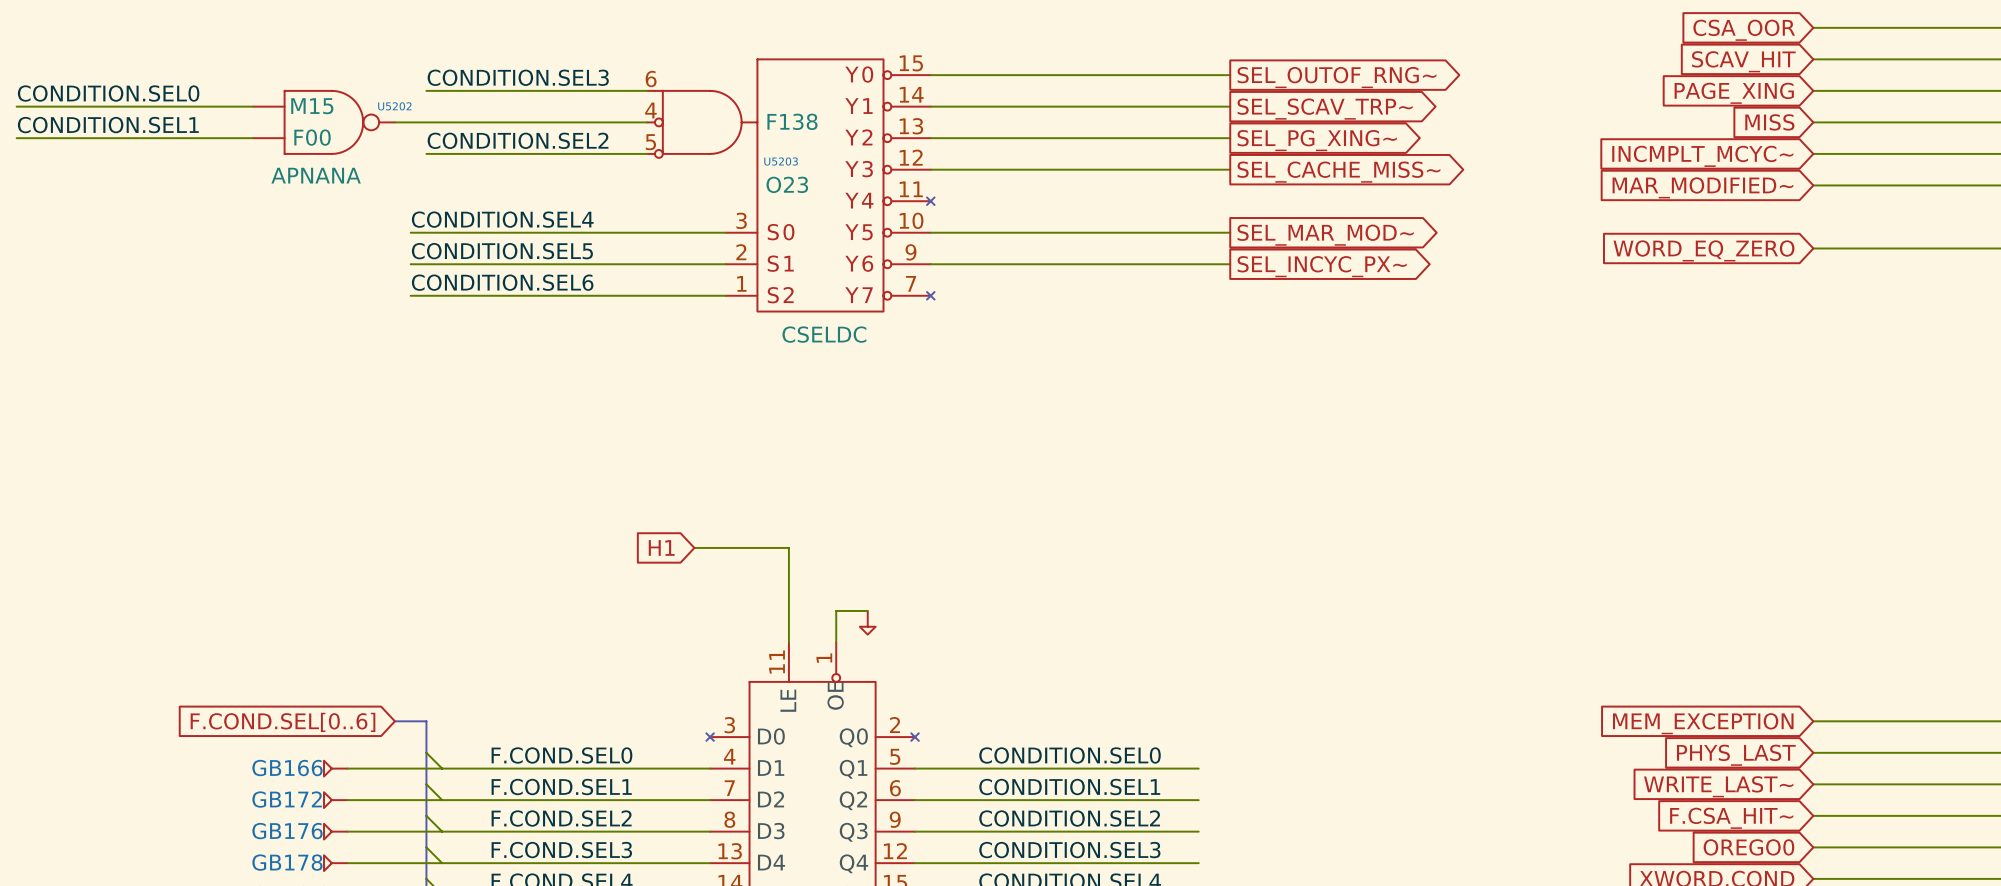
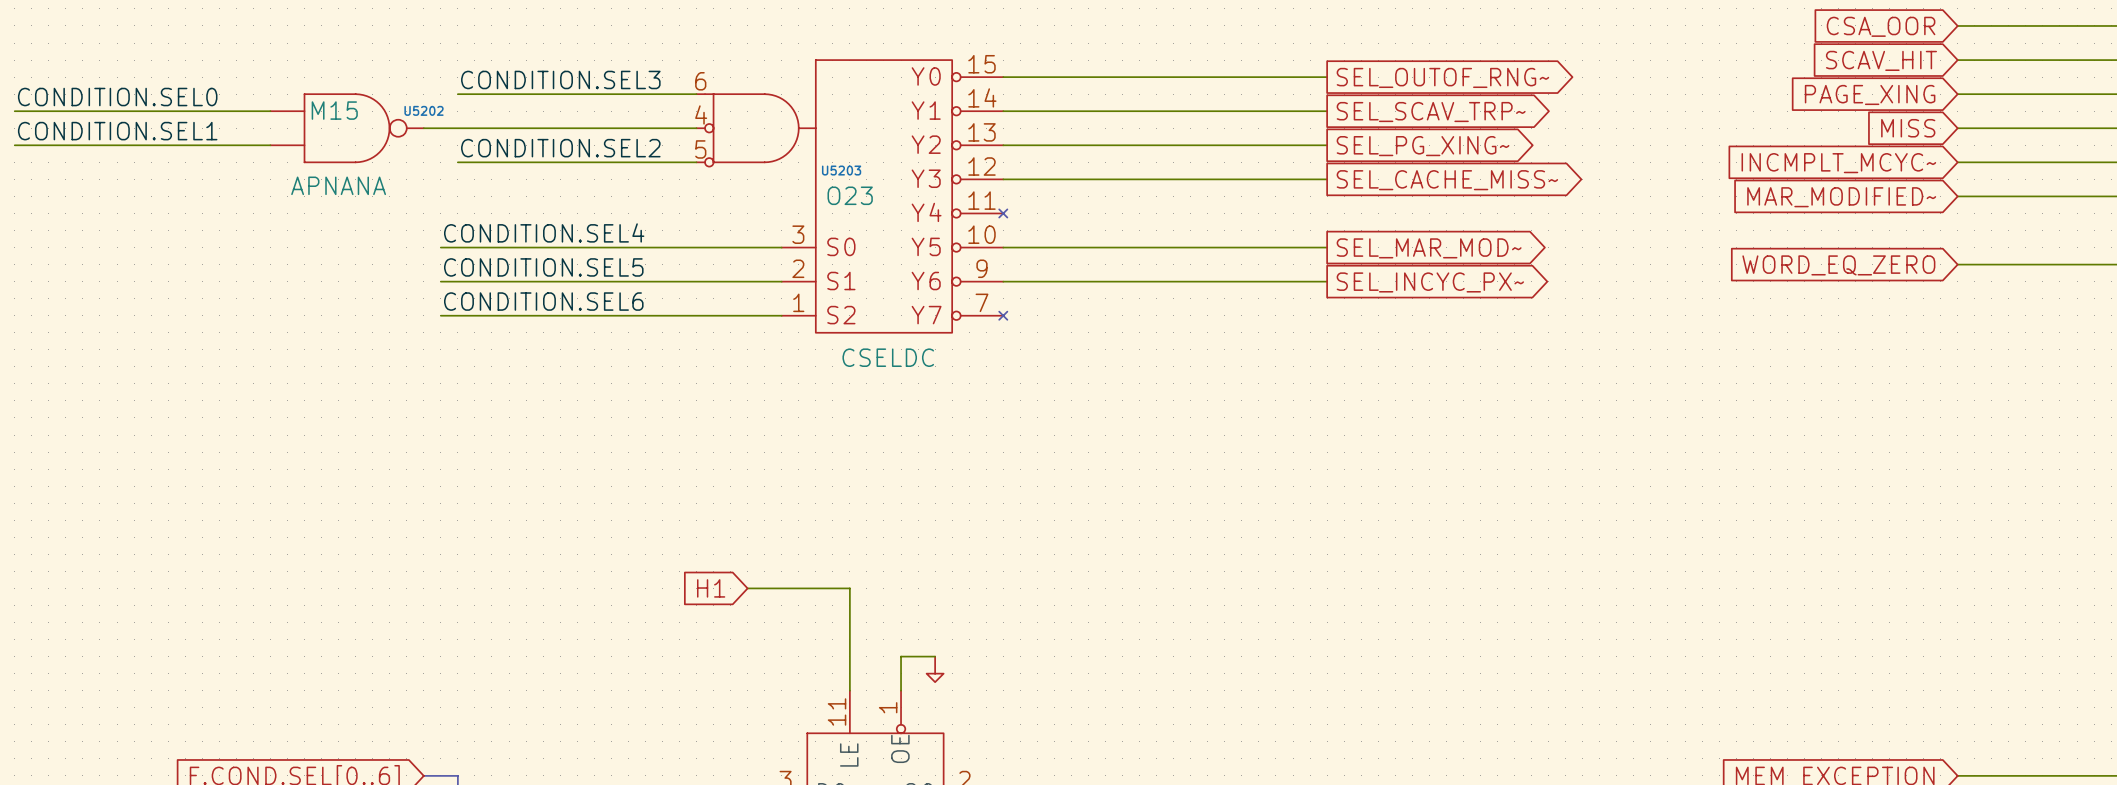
U5203 value: F138 (792, 121) -> none
U5202 value: F00 (312, 137) -> none

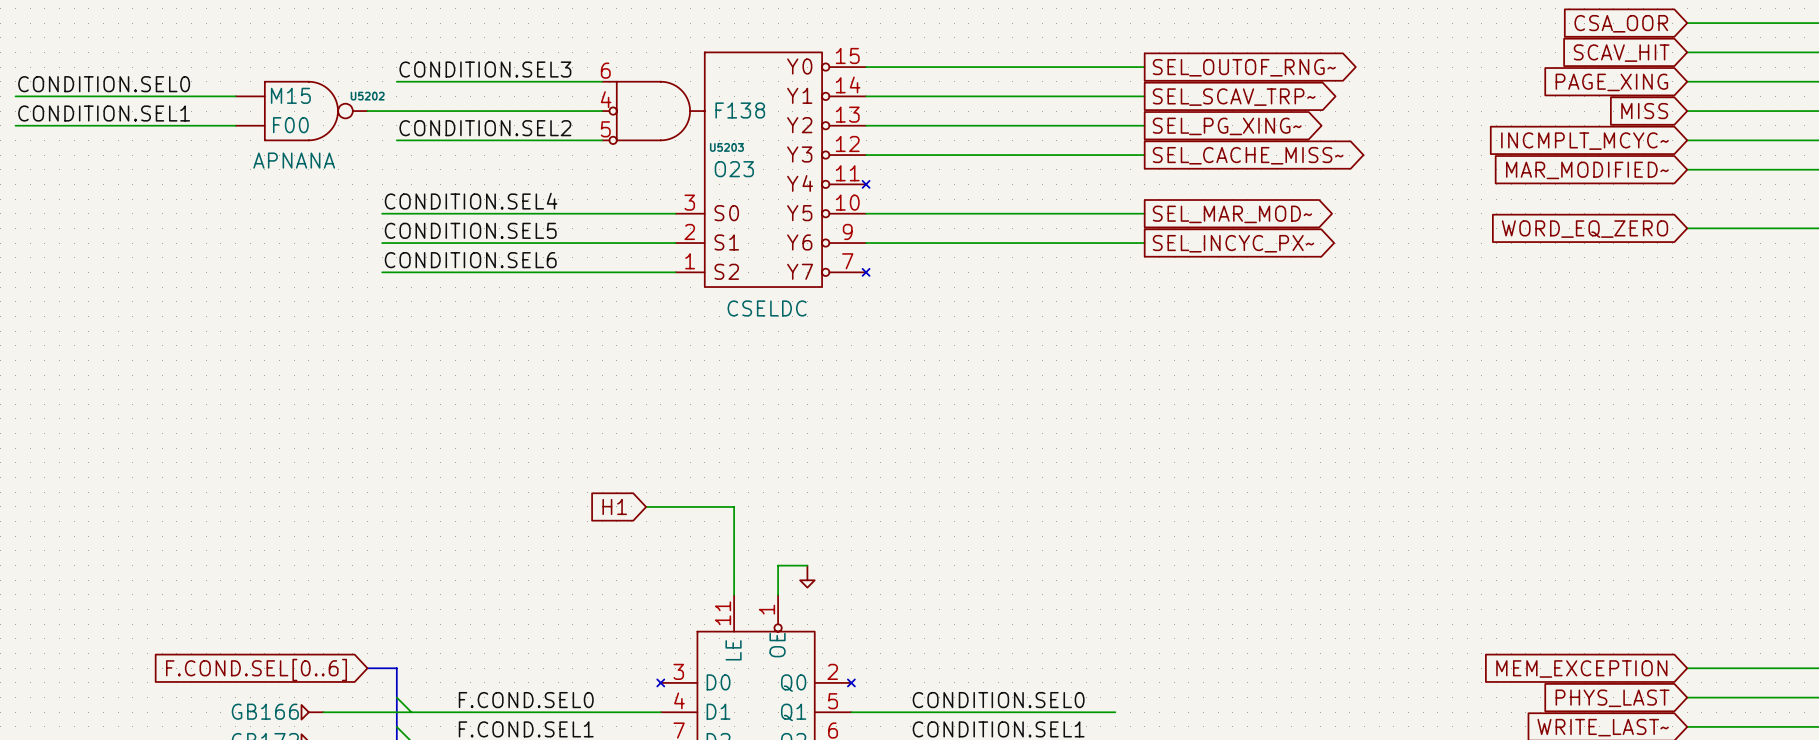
U5203 value: none -> F138 (740, 110)
U5202 value: none -> F00 (290, 125)

